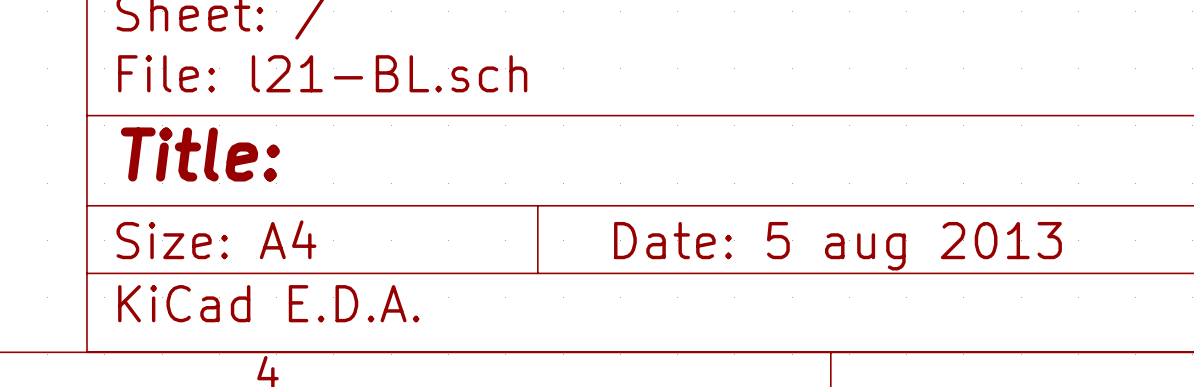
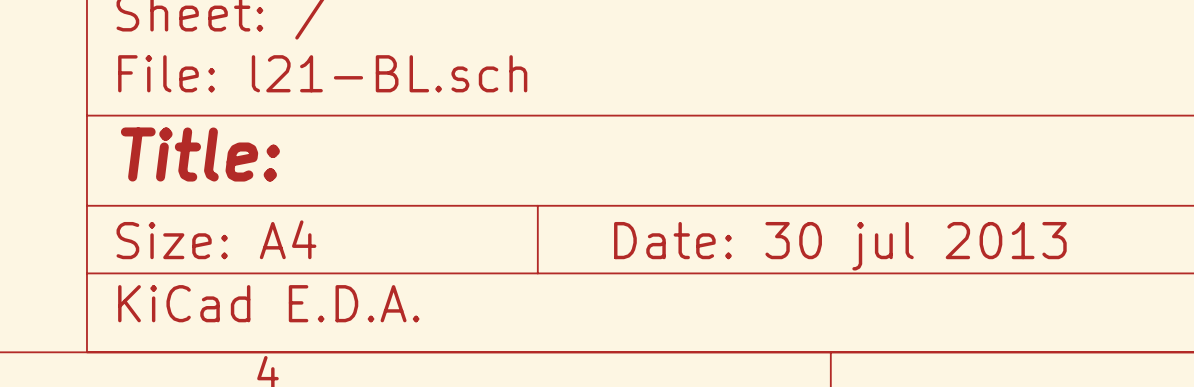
title block: Date: 5 aug 2013 (837, 246) -> Date: 30 jul 2013 (840, 246)

